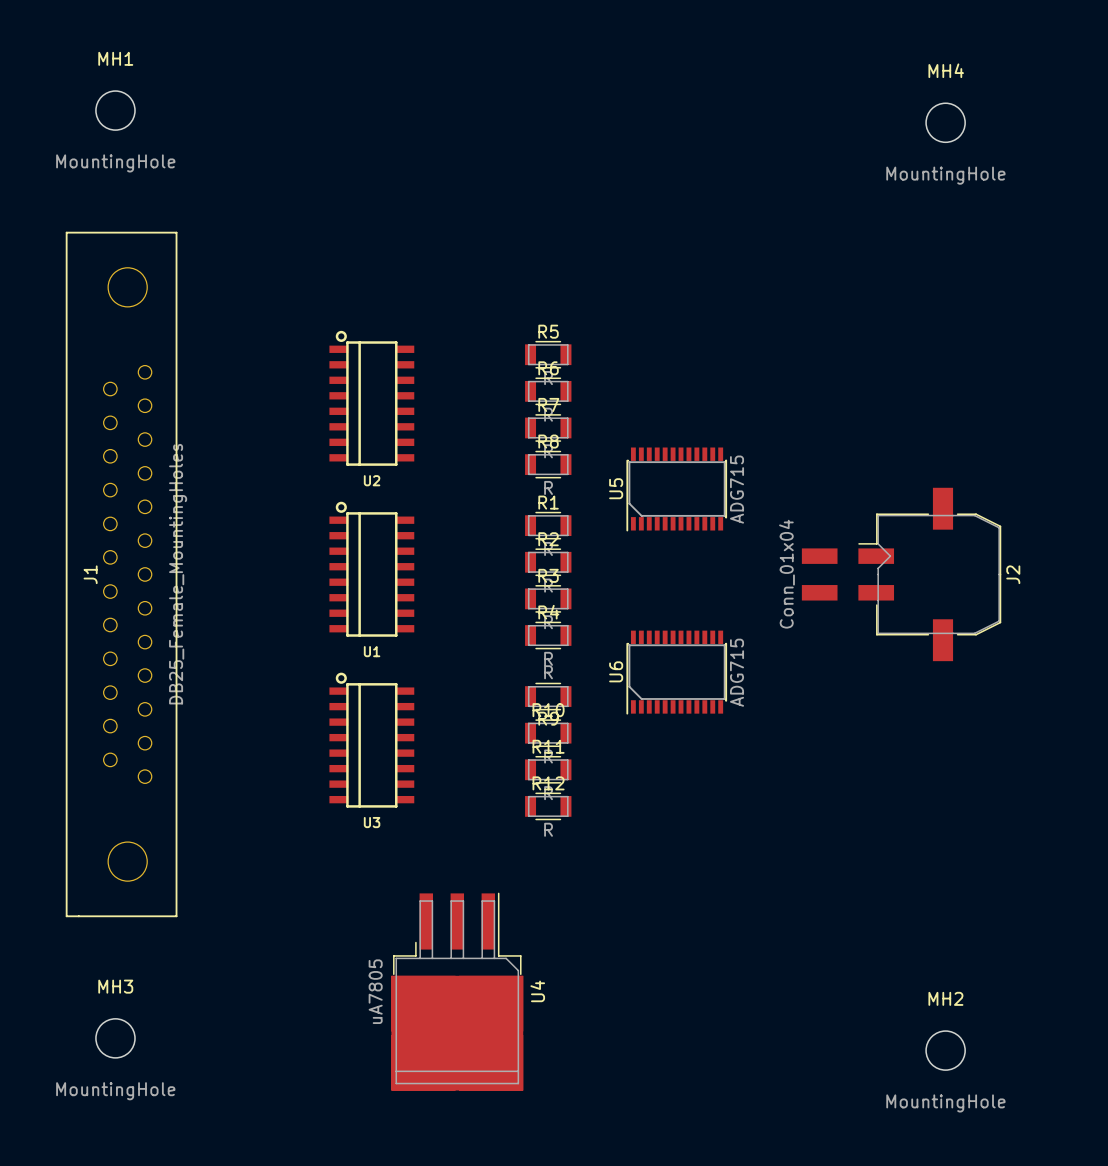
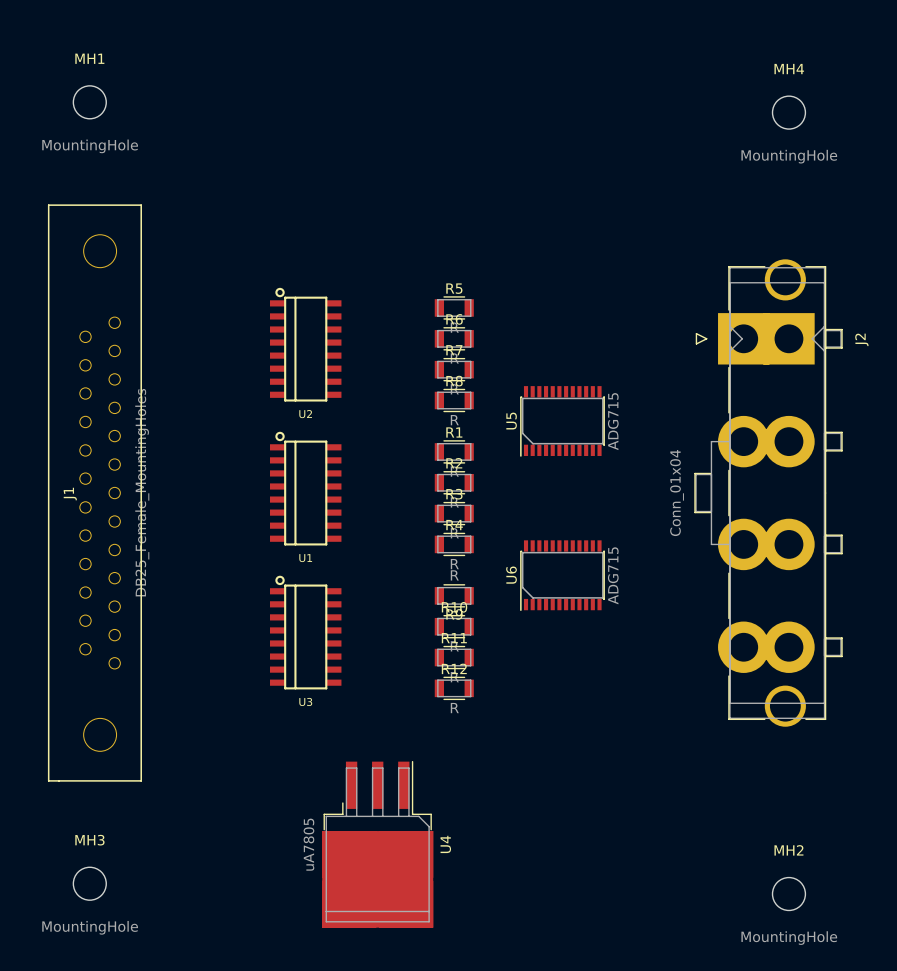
J2 footprint: [801, 487, 1002, 662] -> [694, 259, 843, 727]
J2 name position: J2 (1013, 574) -> J2 (861, 339)

